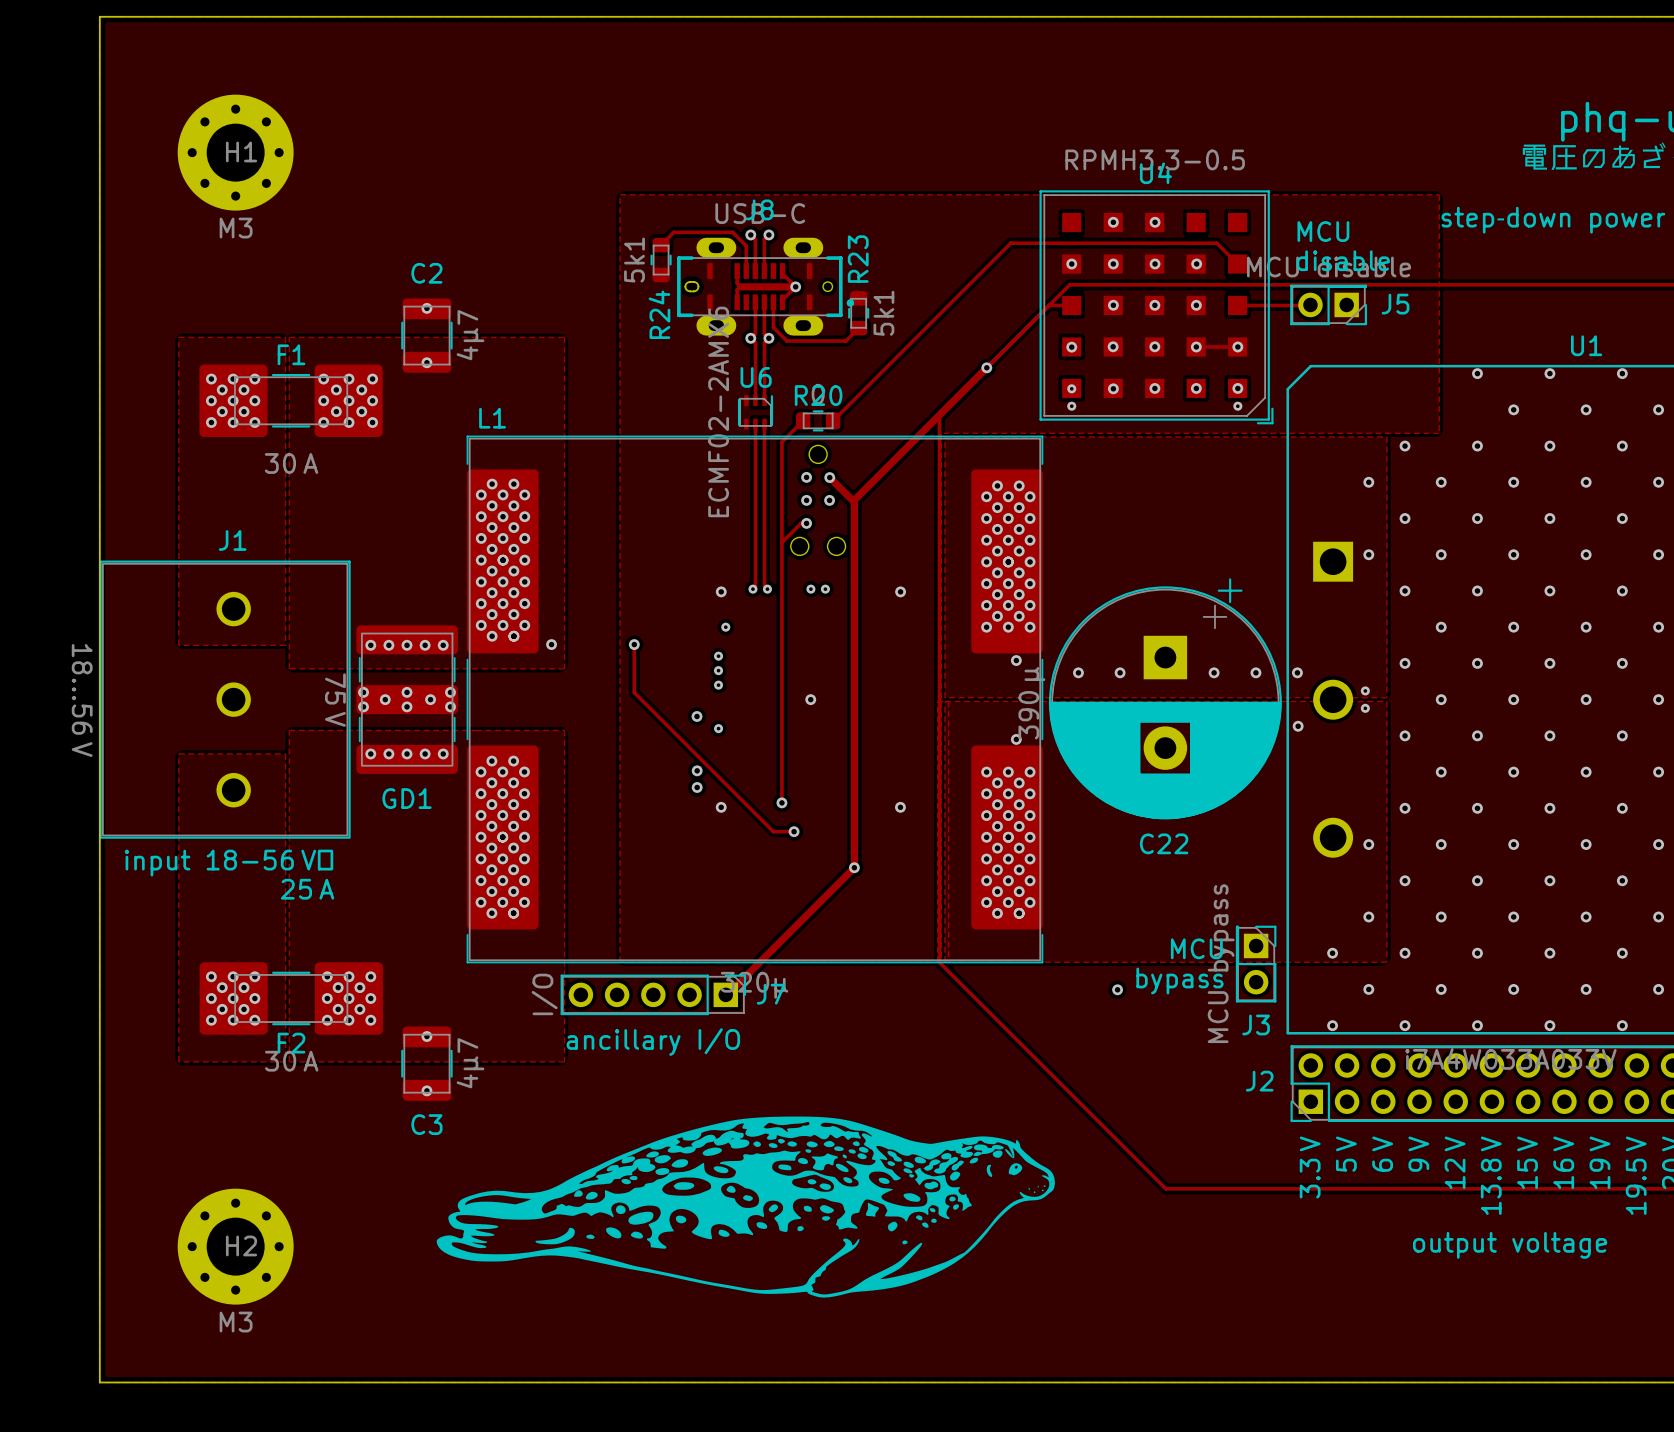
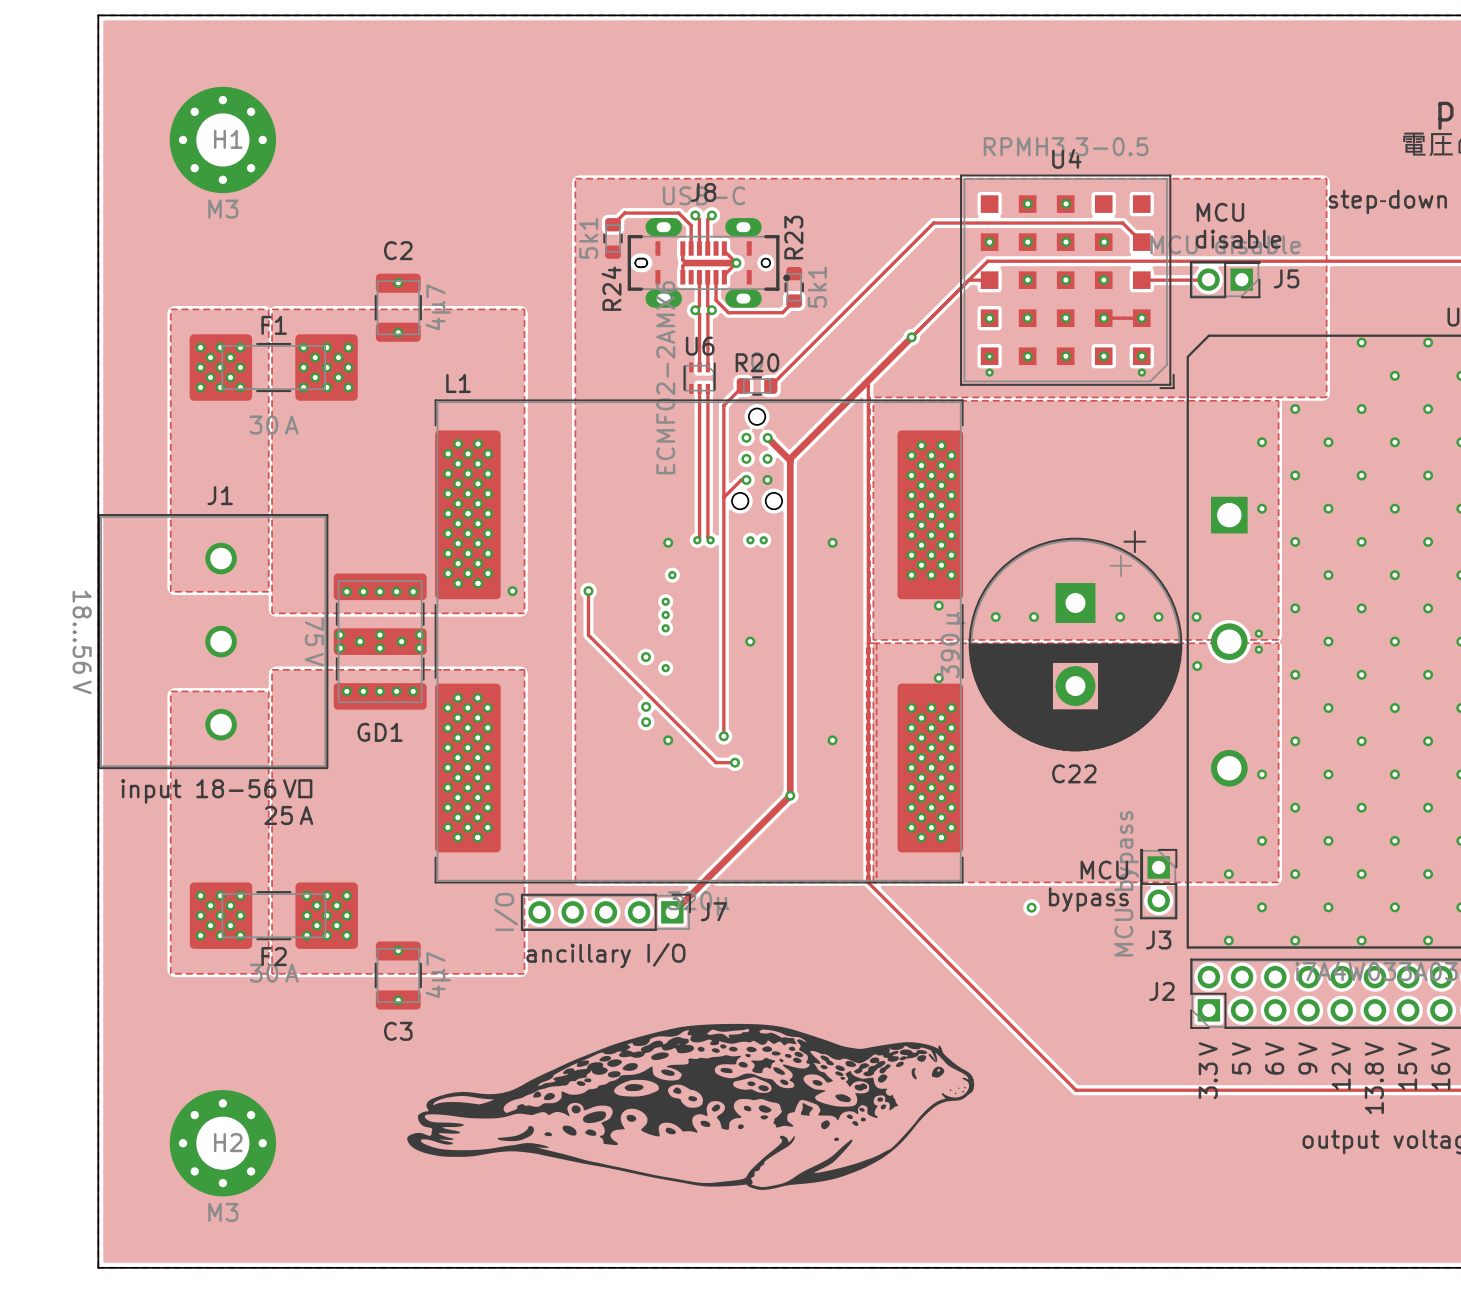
via: none -> (767, 479)

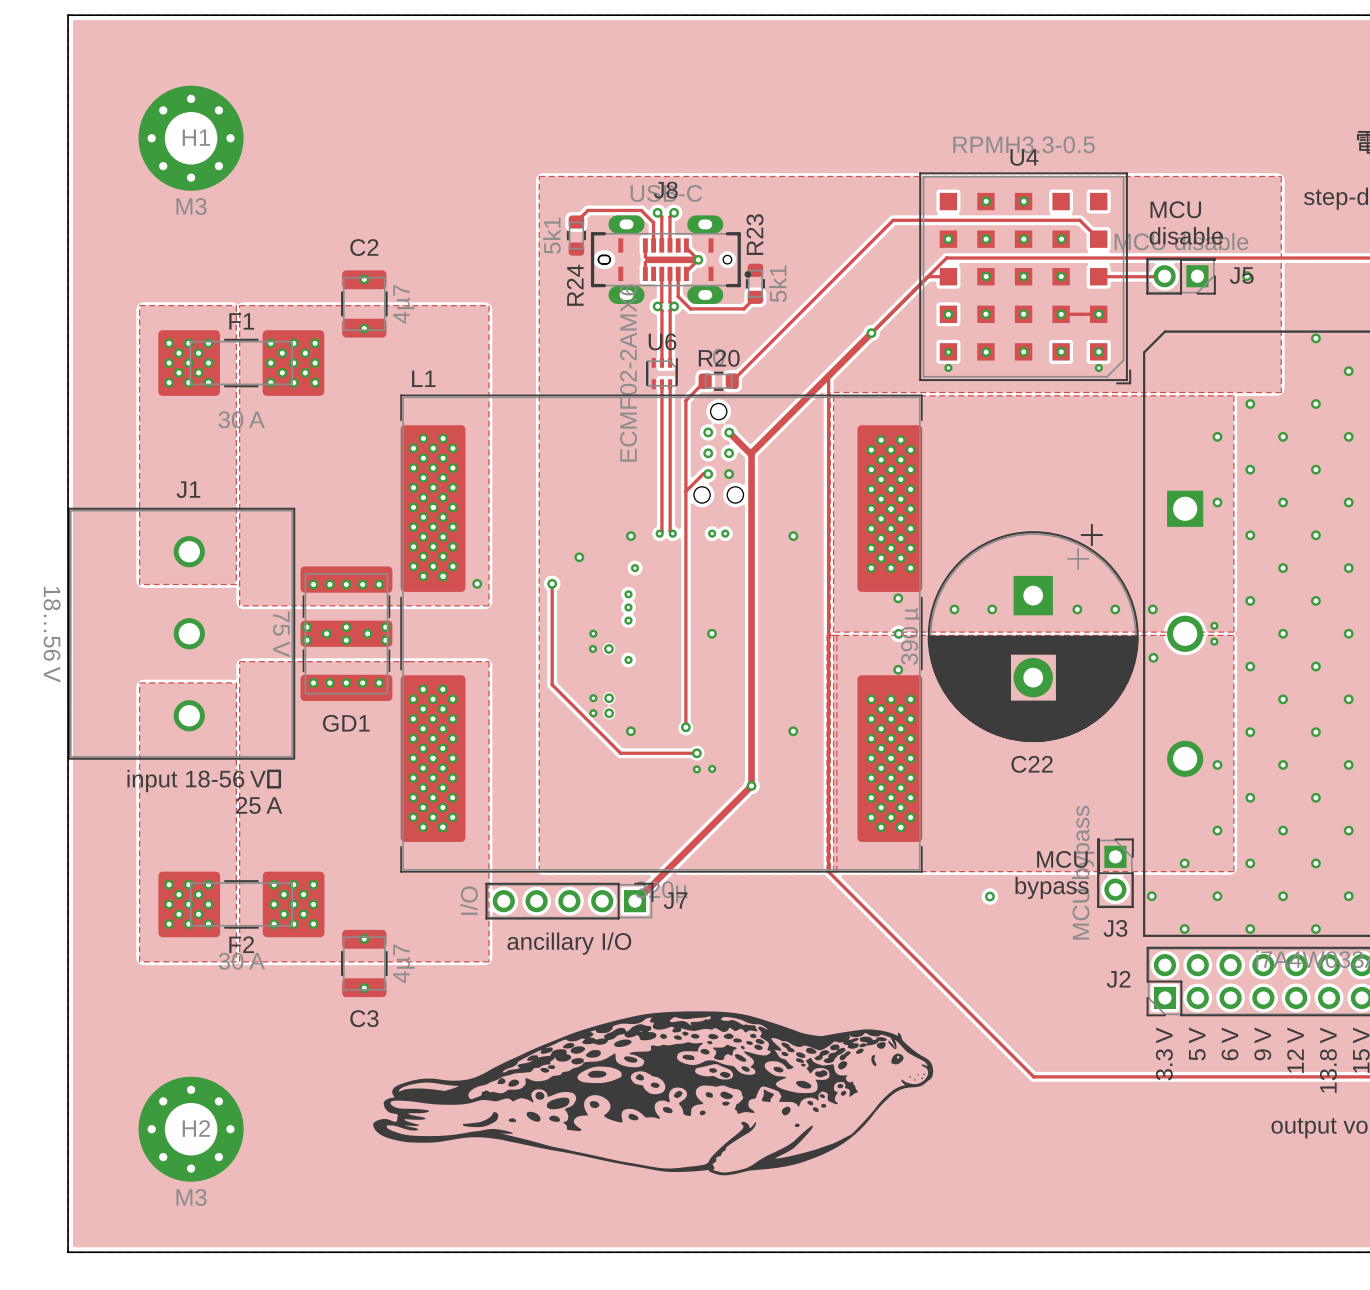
via: none -> (1247, 276)
via: none -> (579, 557)
track: (588, 635) (716, 762) -> (552, 627) (552, 684) (620, 753) (678, 753)
via: none -> (593, 633)
via: none -> (898, 633)
via: none -> (592, 648)
via: none -> (593, 698)
via: none -> (593, 713)
via: none -> (696, 769)
via: none -> (712, 768)
via: none -> (1151, 896)

